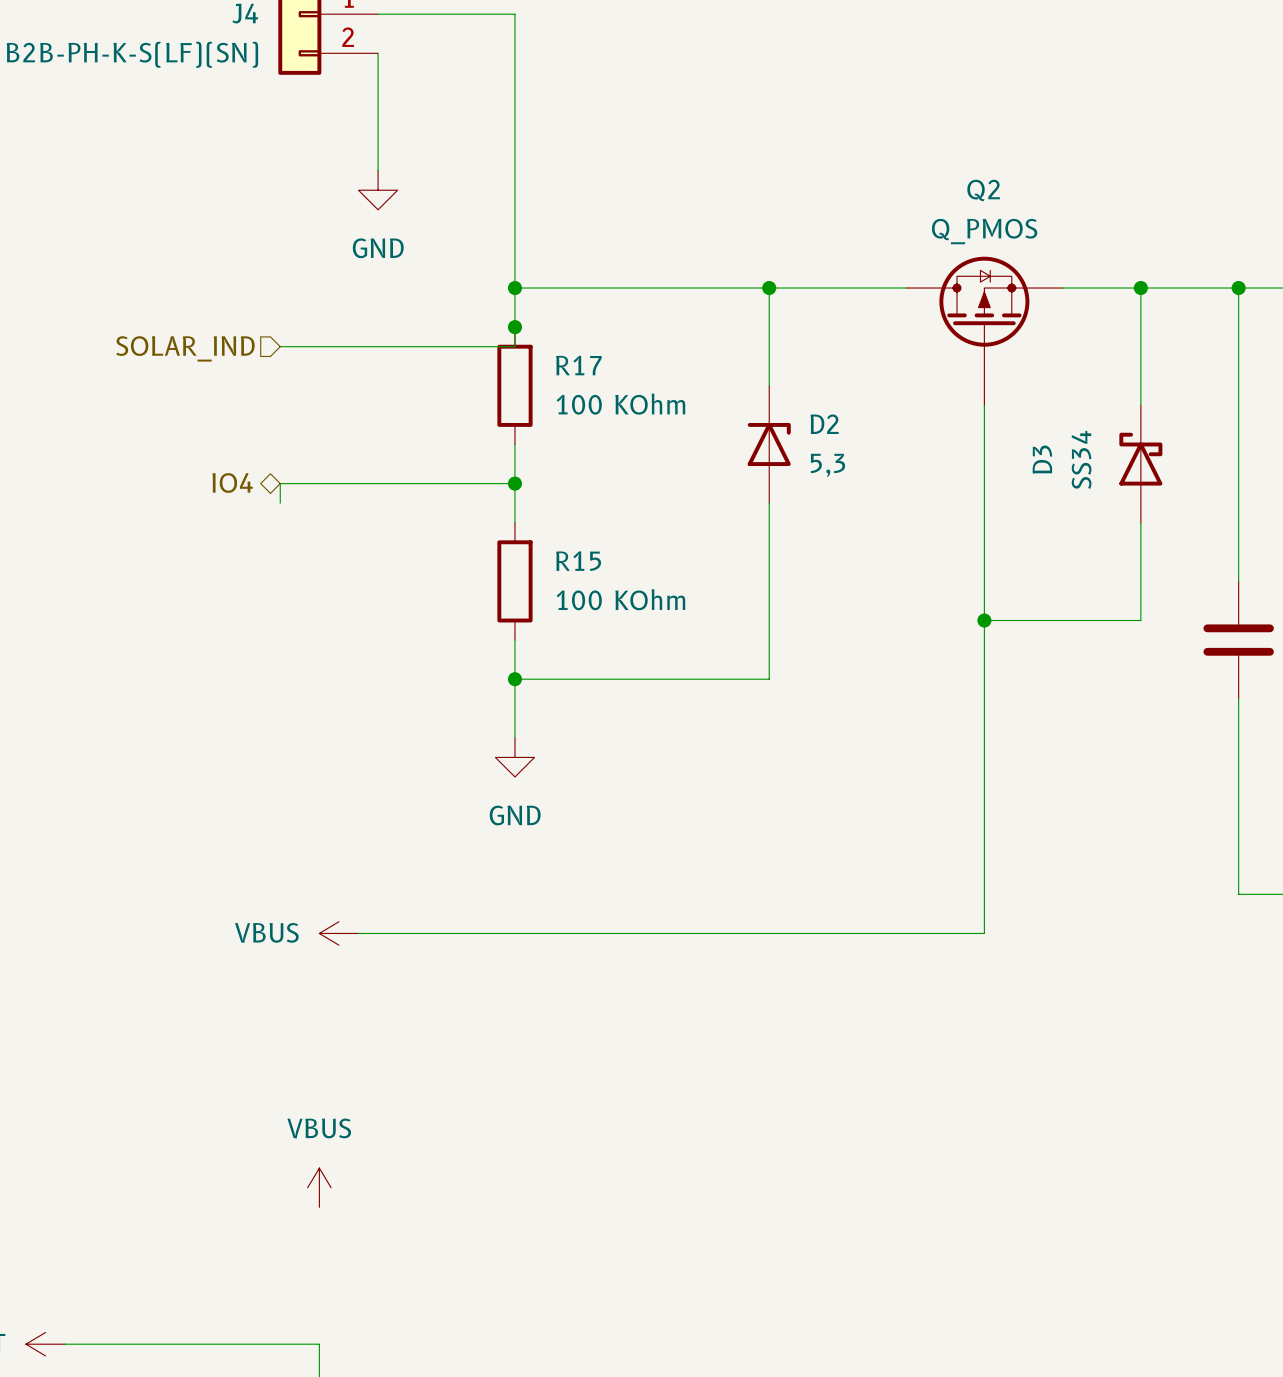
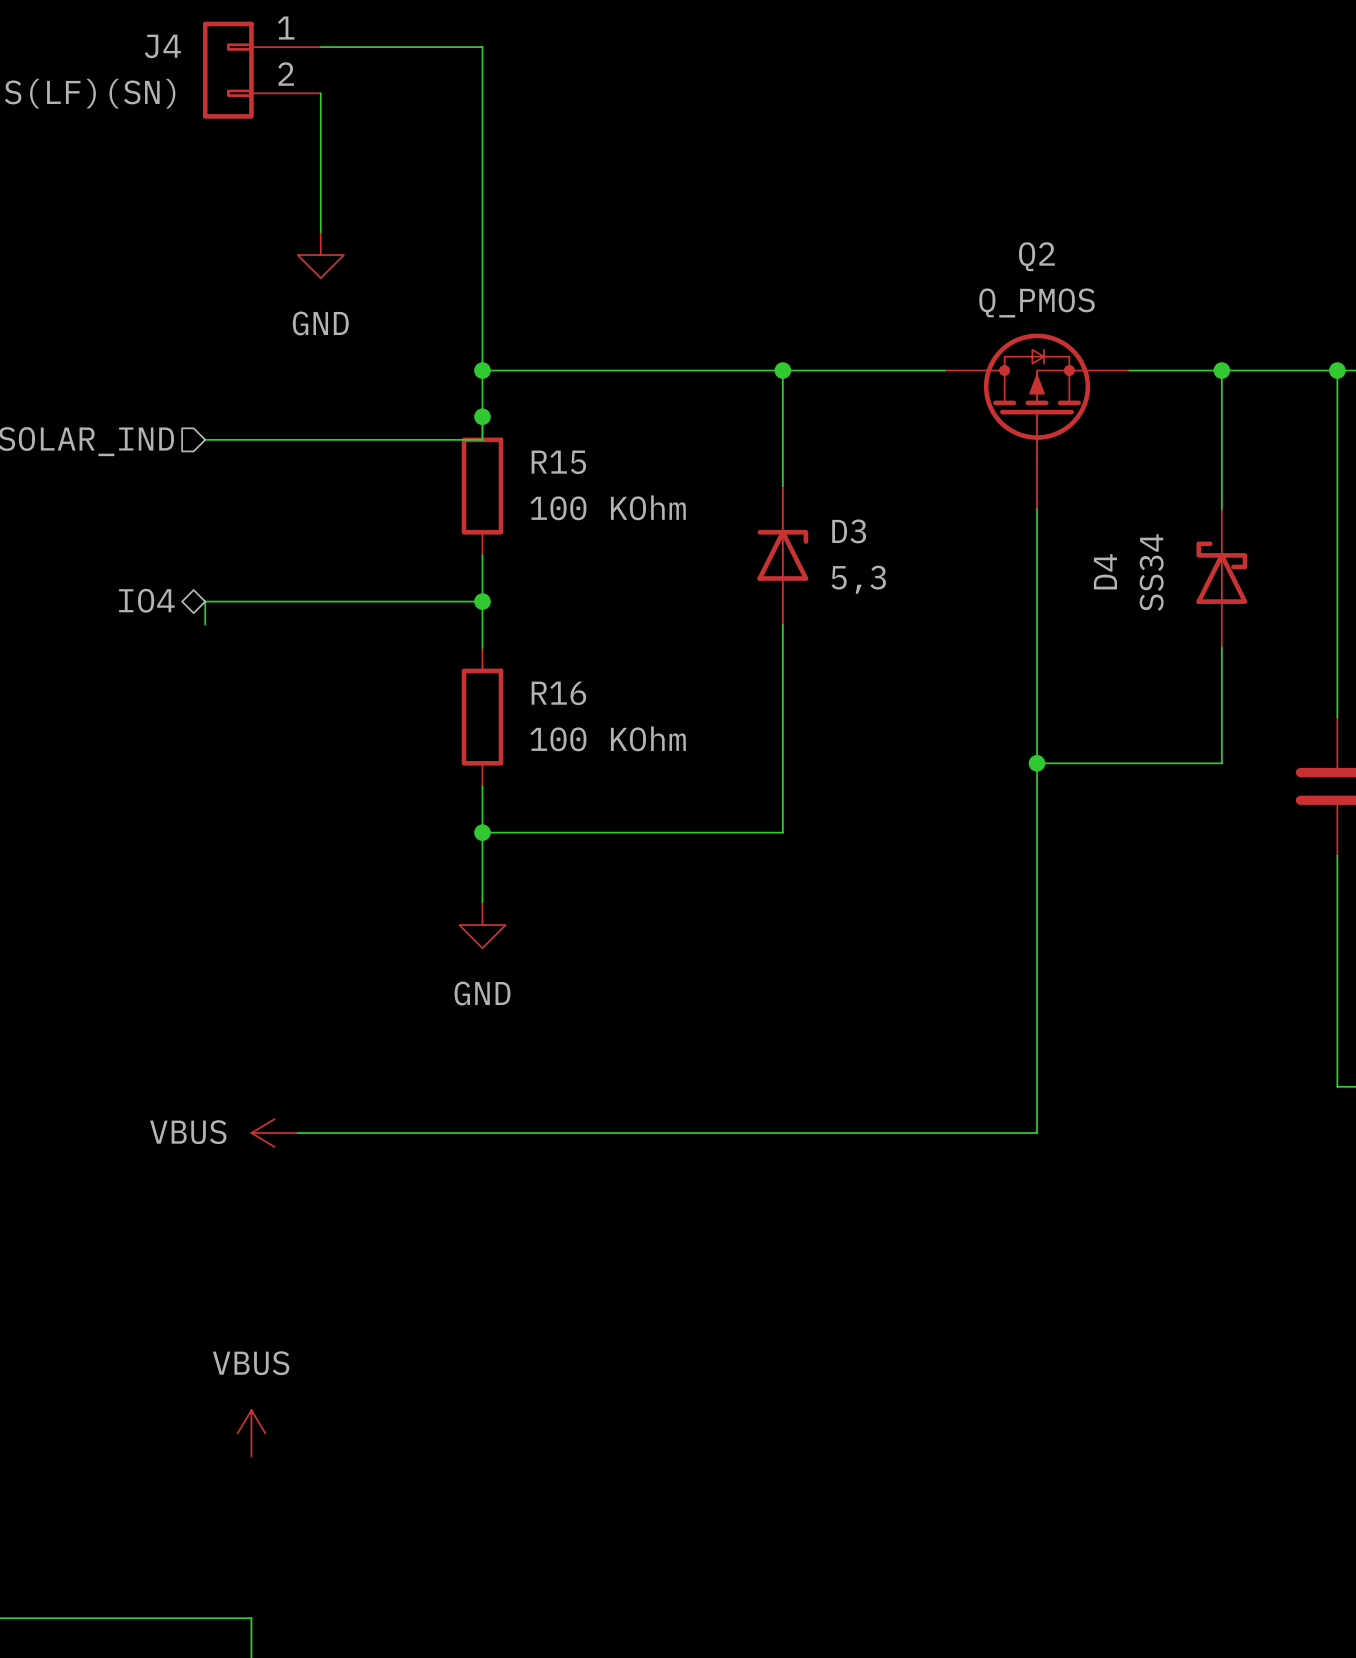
R17 name: R17 (578, 365) -> R15 (558, 462)
D2 name: D2 (824, 424) -> D3 (849, 531)
D3 name: D3 (1042, 459) -> D4 (1105, 571)
R15 name: R15 (578, 561) -> R16 (558, 693)

